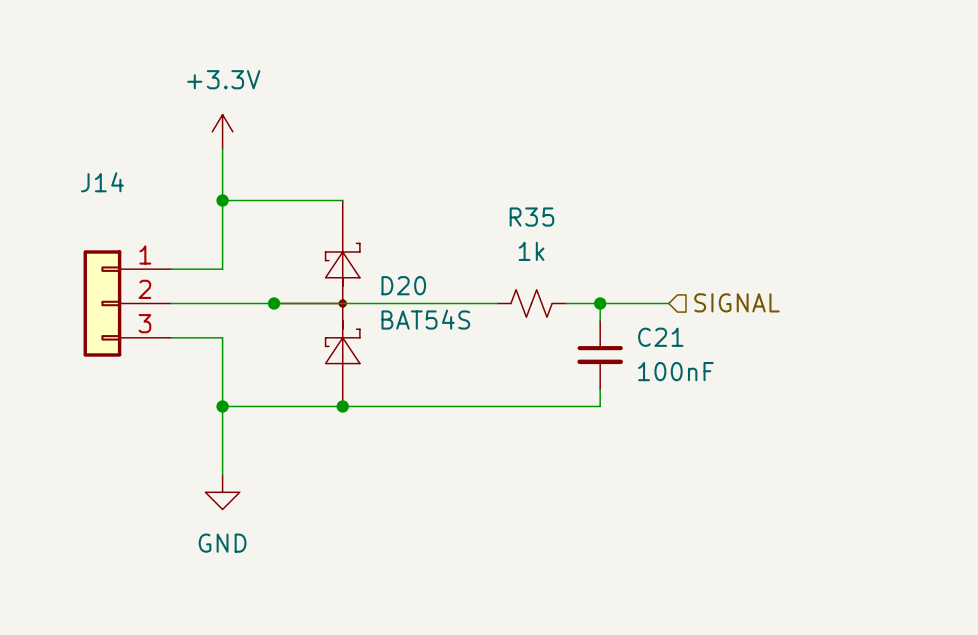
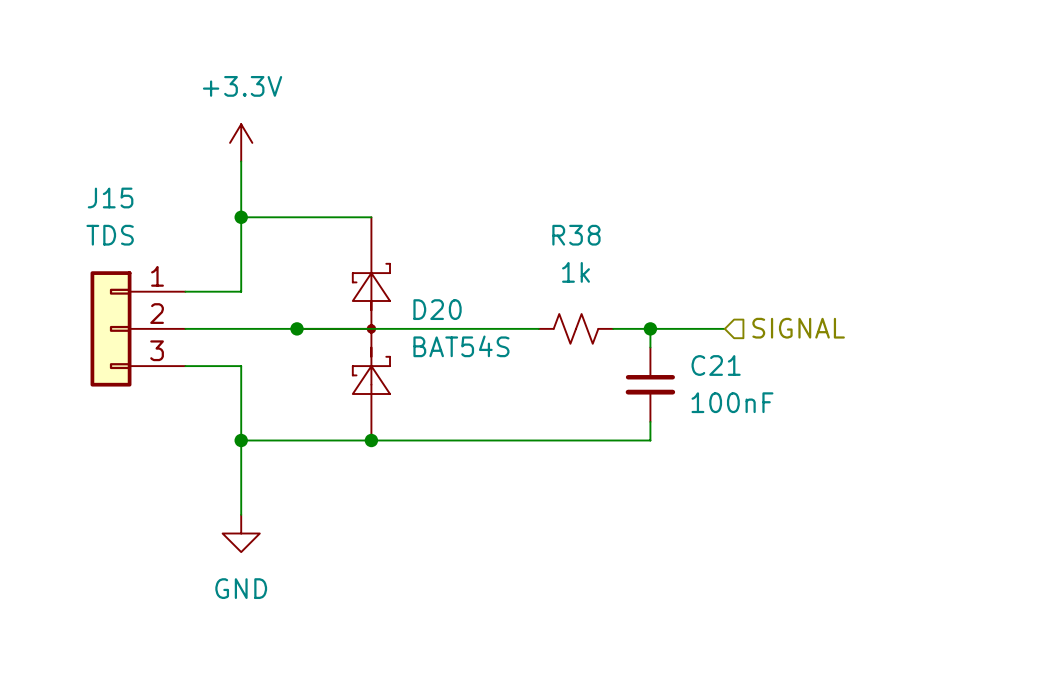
J14 name: J14 (102, 182) -> J15 (110, 198)
J14 value: none -> TDS (110, 235)
R35 name: R35 (531, 217) -> R38 (576, 235)

